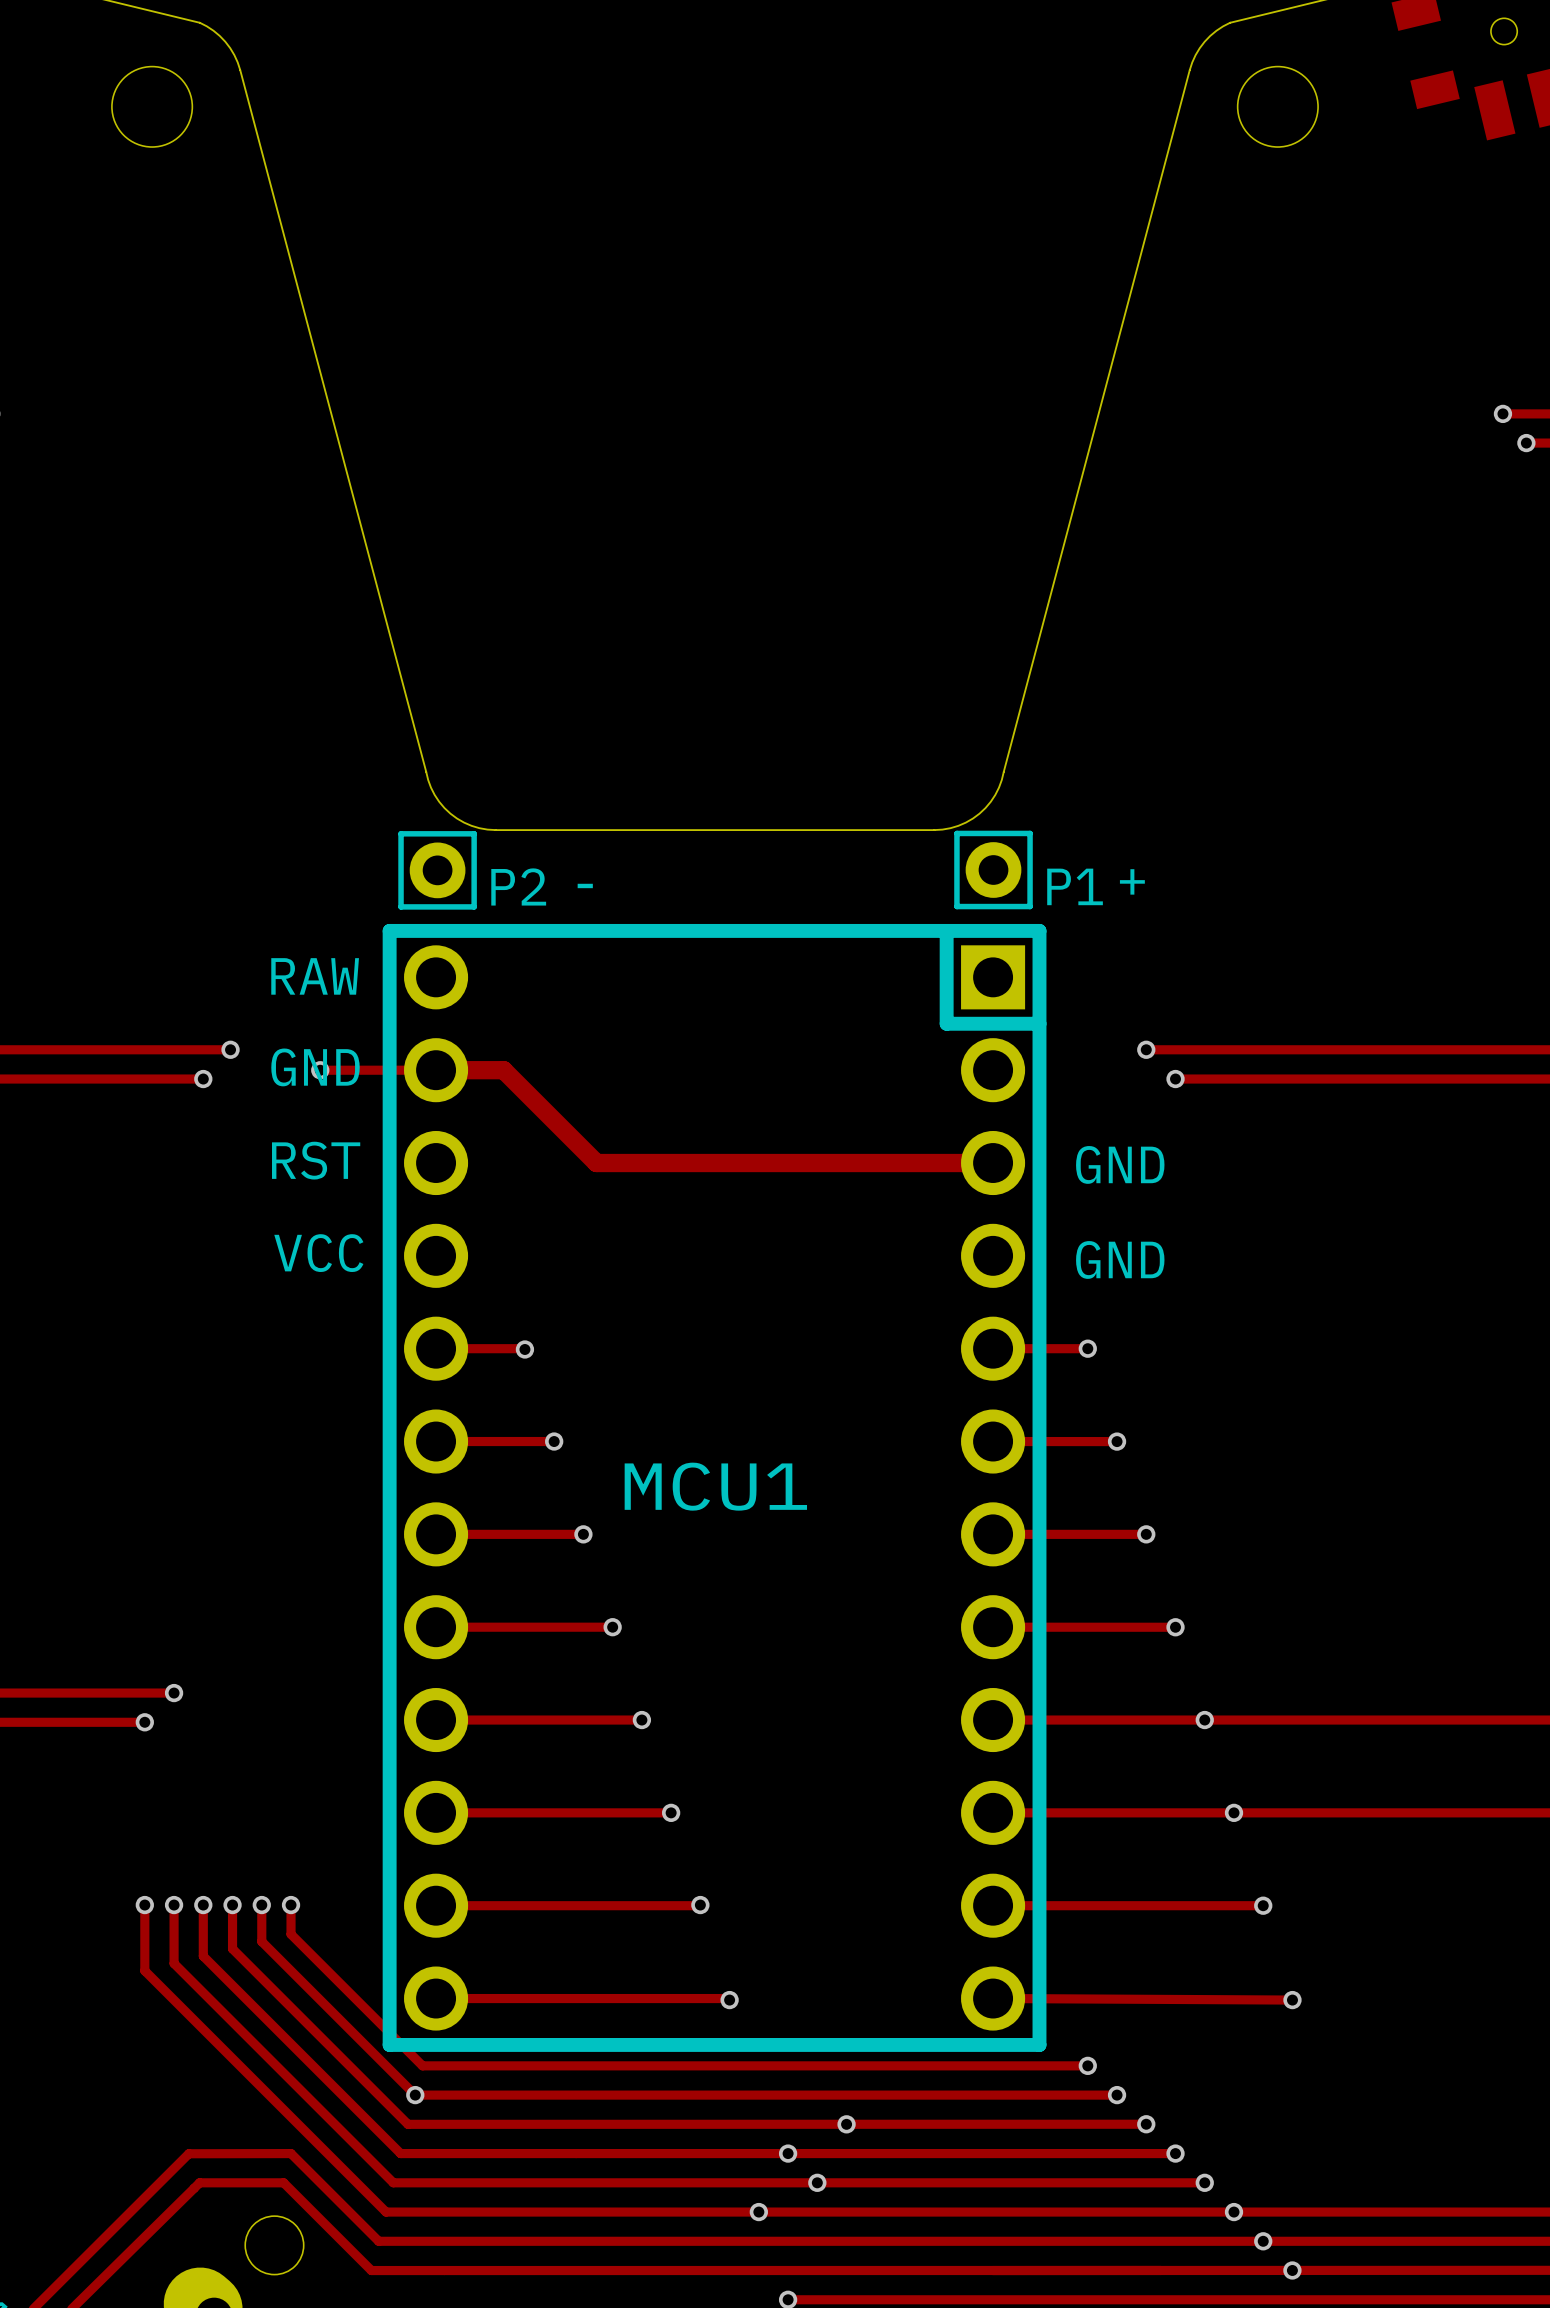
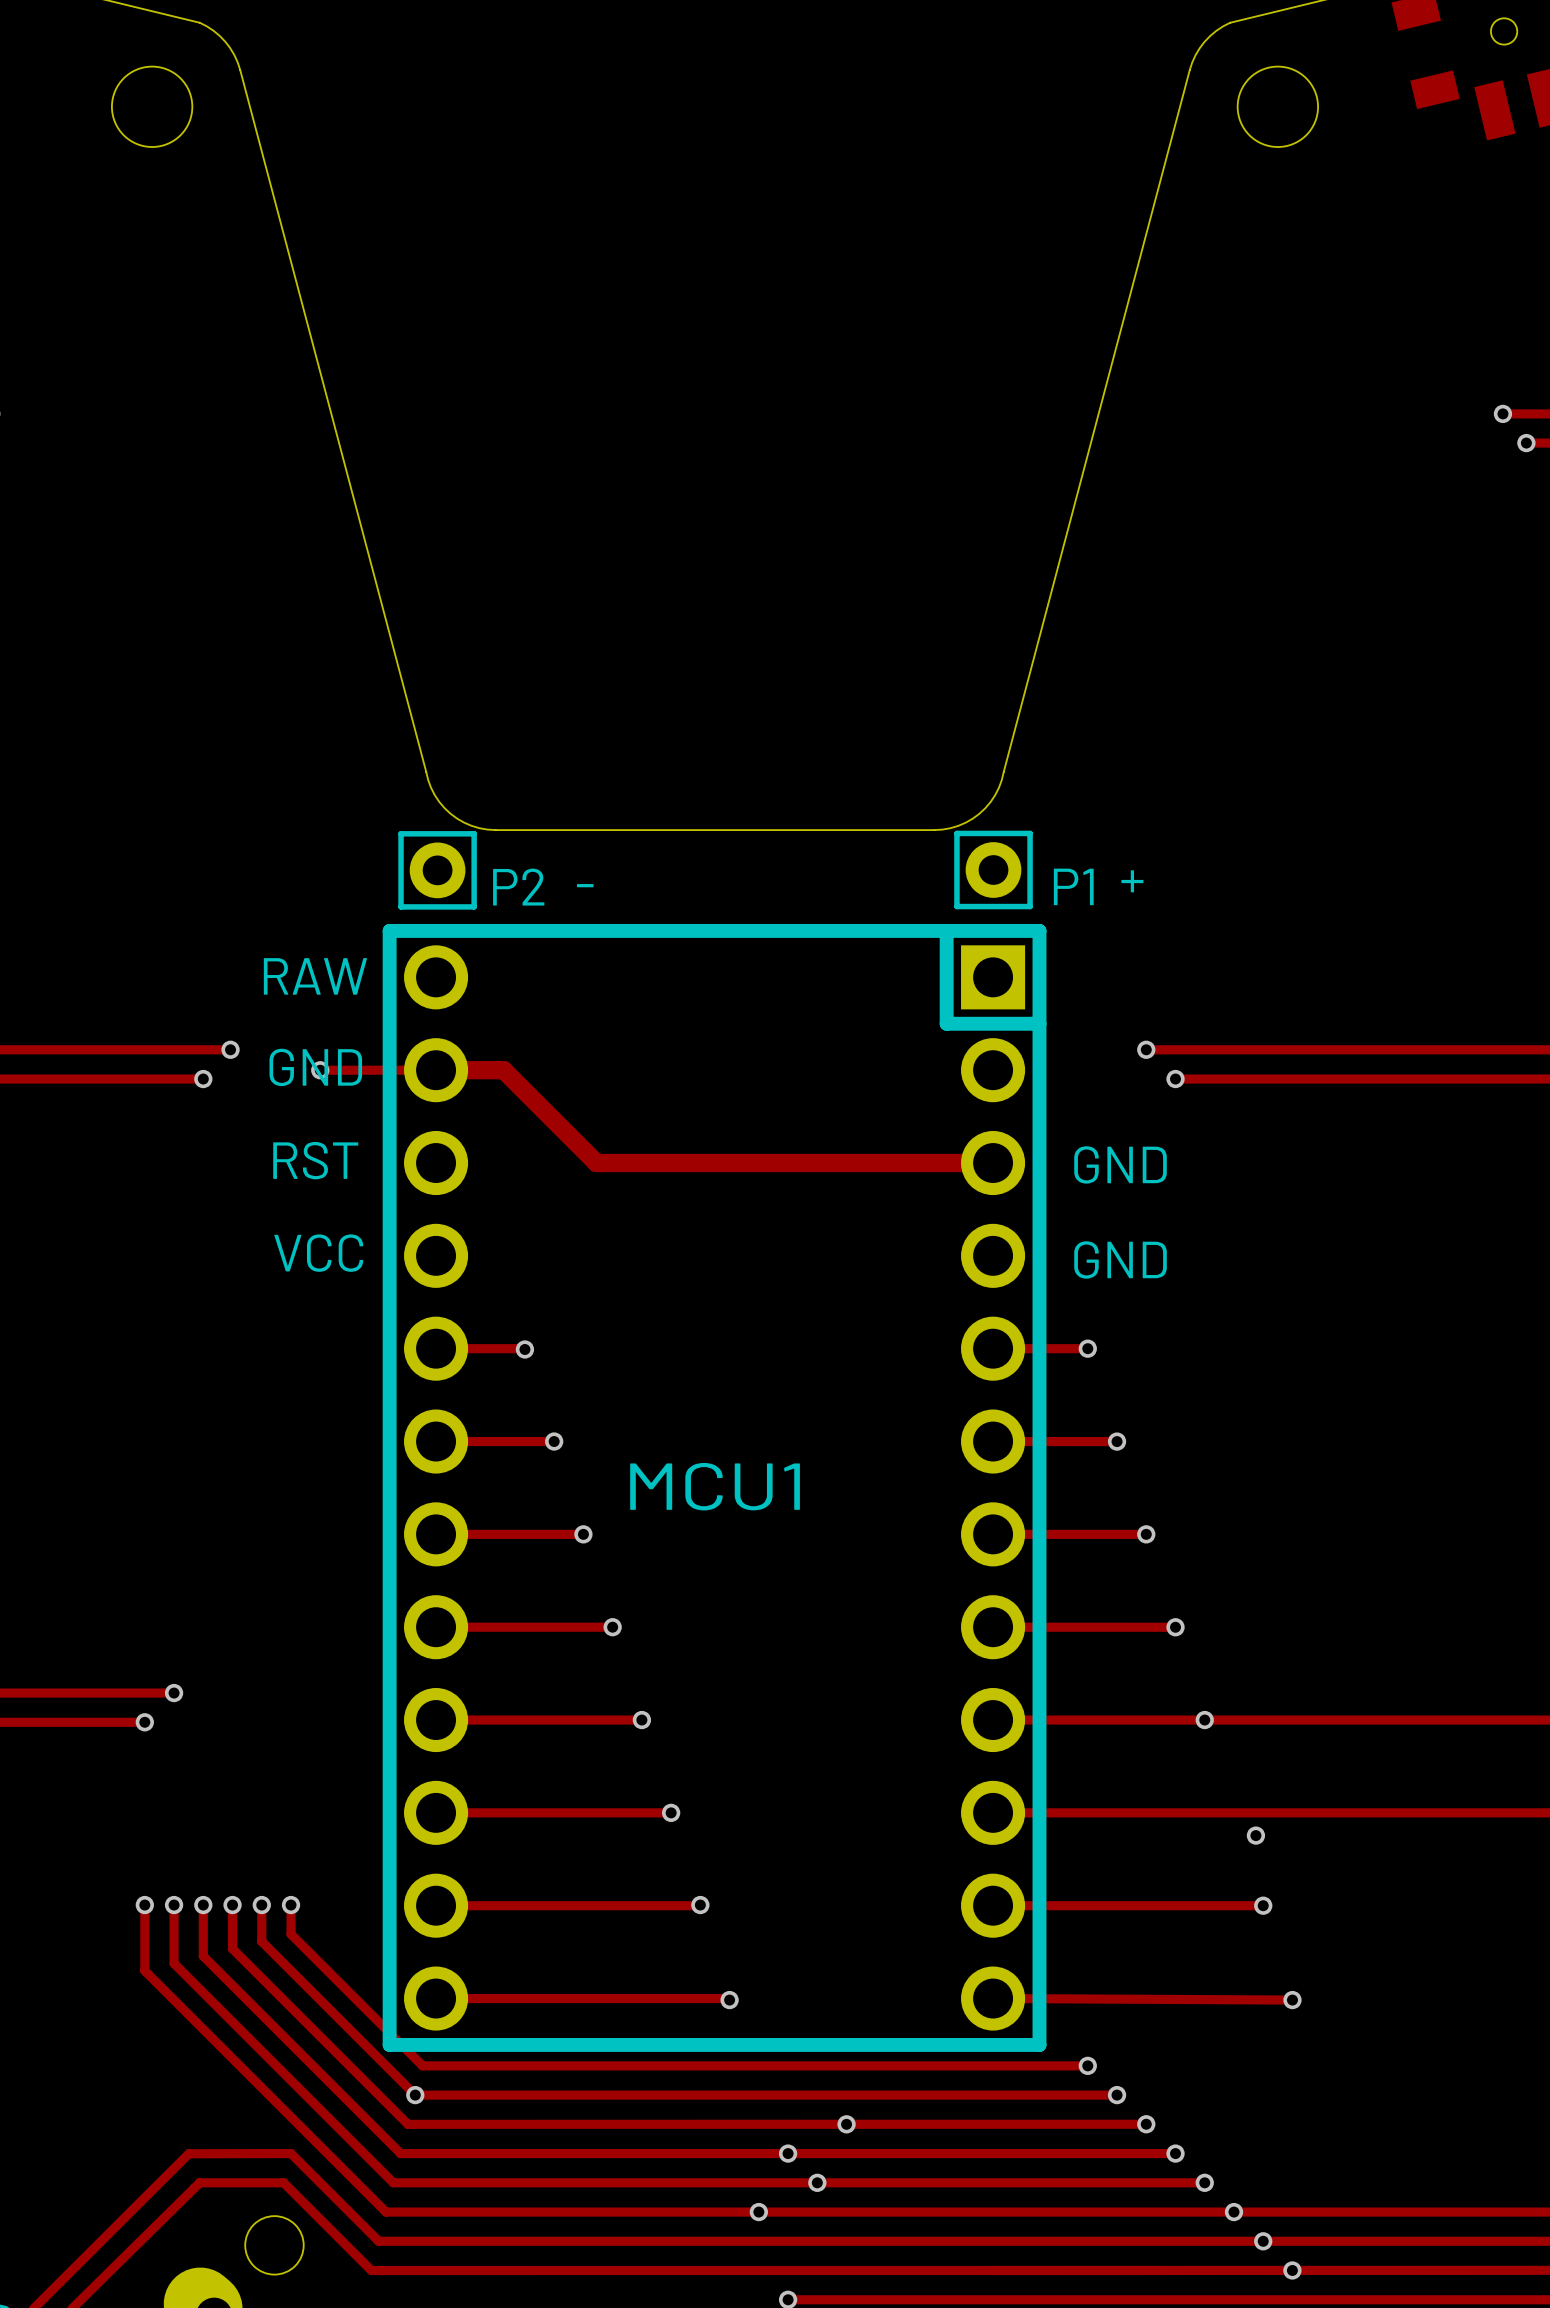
via position: (1234, 1812) -> (1255, 1835)

